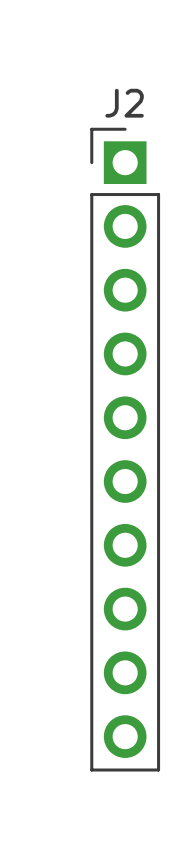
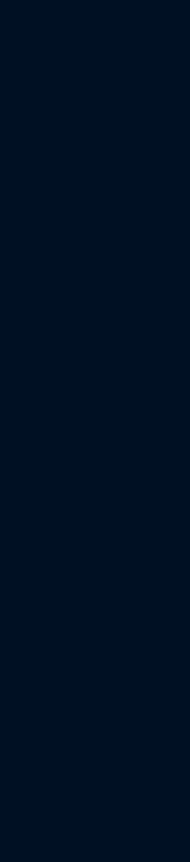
J2: (125, 449) -> none

